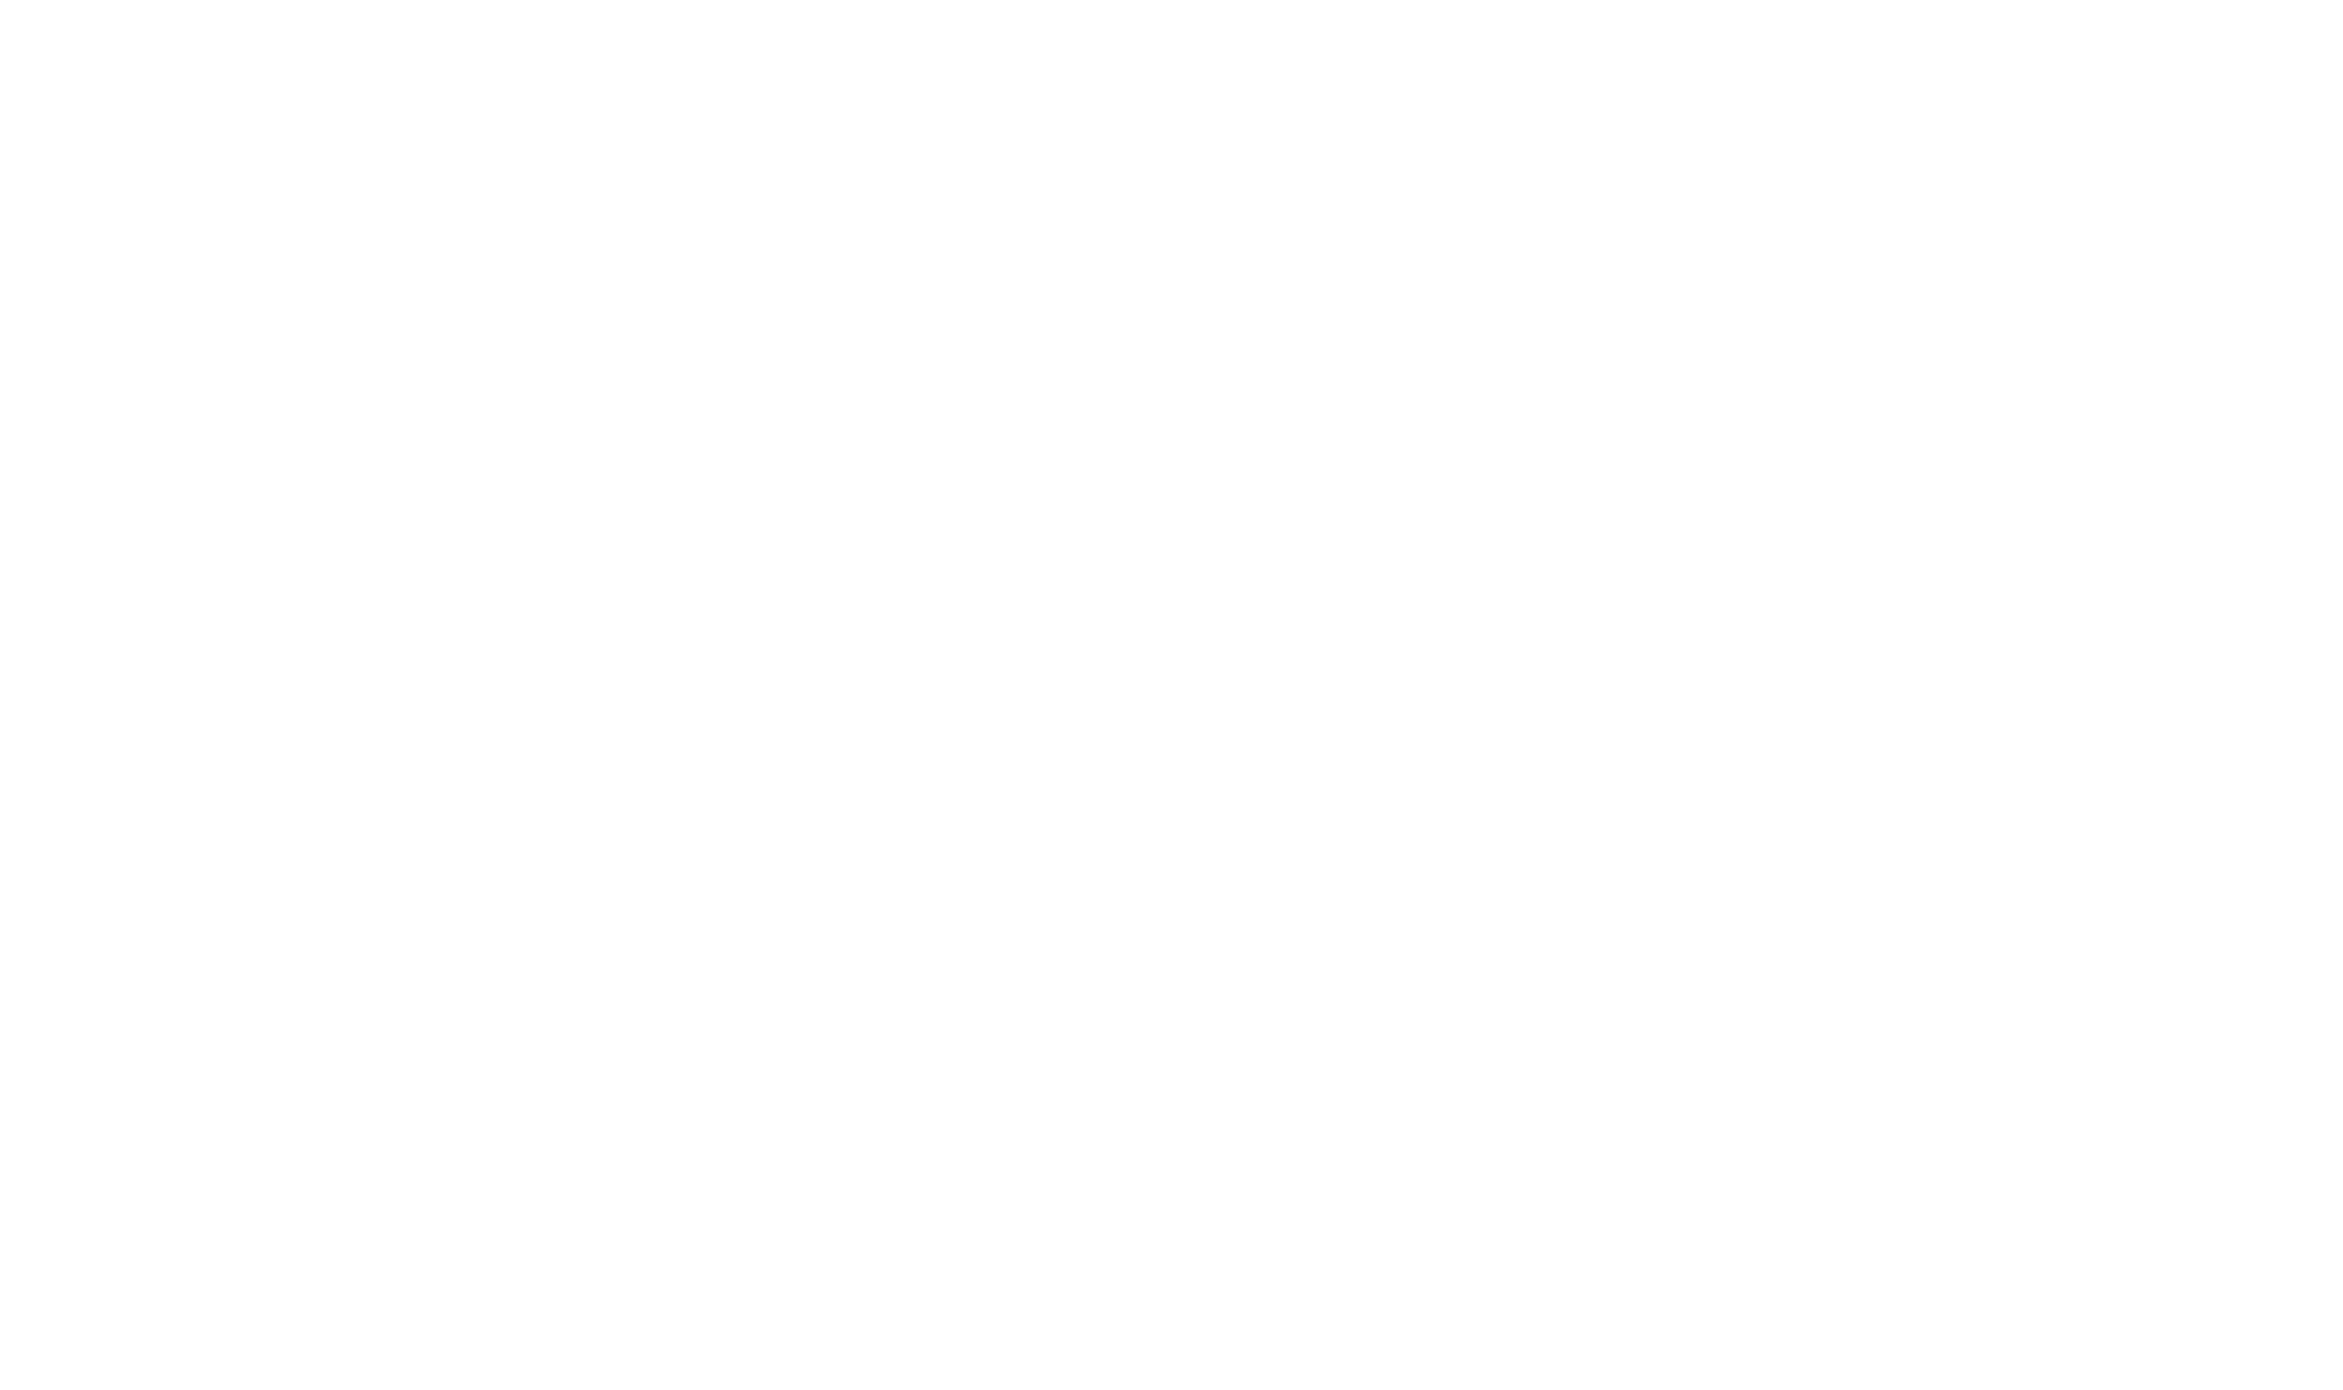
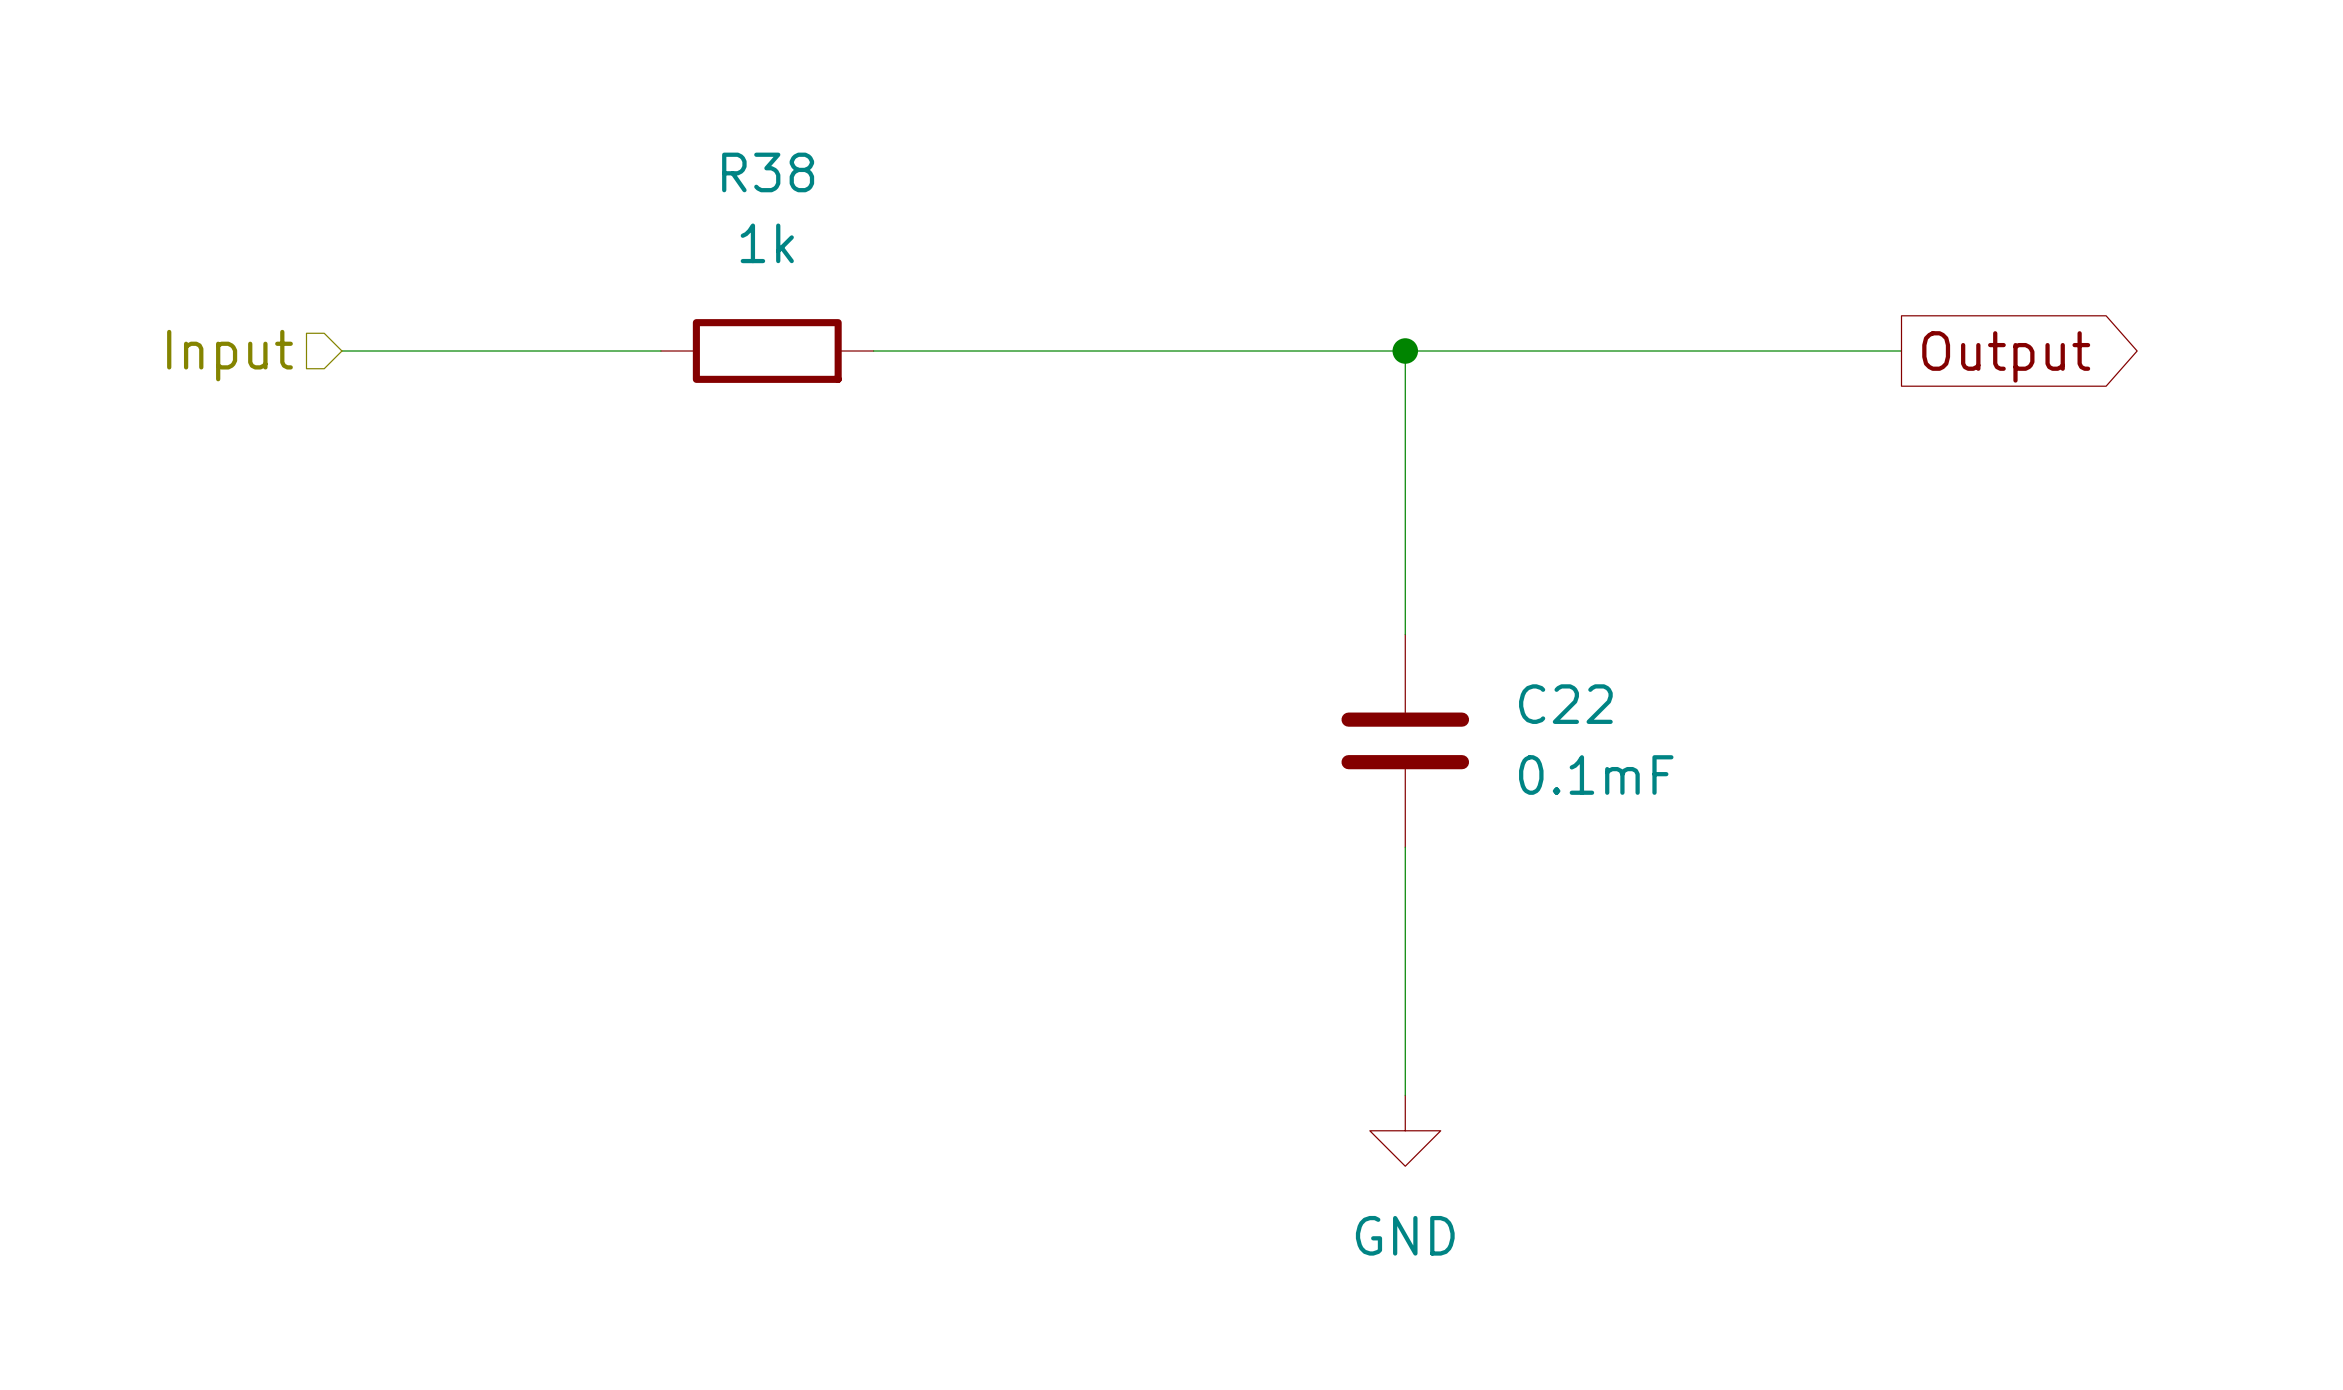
wire: none -> (341, 351) (660, 351)
R38: none -> 1k (767, 351)
wire: none -> (873, 351) (1901, 351)
wire: none -> (1405, 351) (1405, 634)
junction: none -> (1405, 351)
hierarchical label: none -> Input (229, 355)
global label: none -> Output (2006, 356)
C22: none -> 0.1mF (1405, 740)
wire: none -> (1405, 847) (1405, 1095)
power symbol: none -> GND (1405, 1130)

